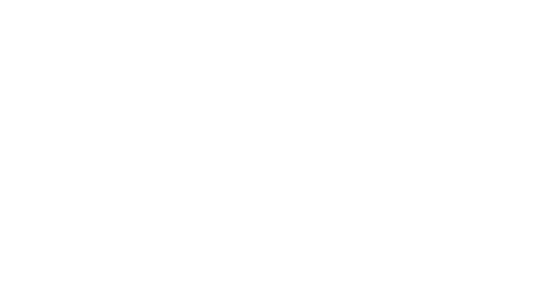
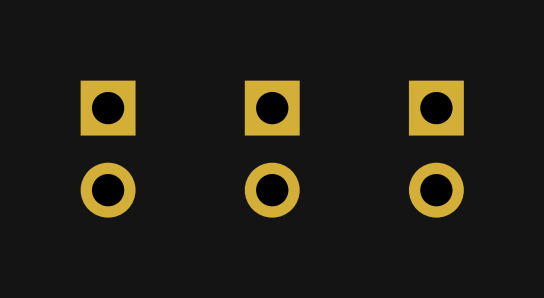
part: none -> (108, 149)
part: none -> (272, 149)
part: none -> (436, 149)

